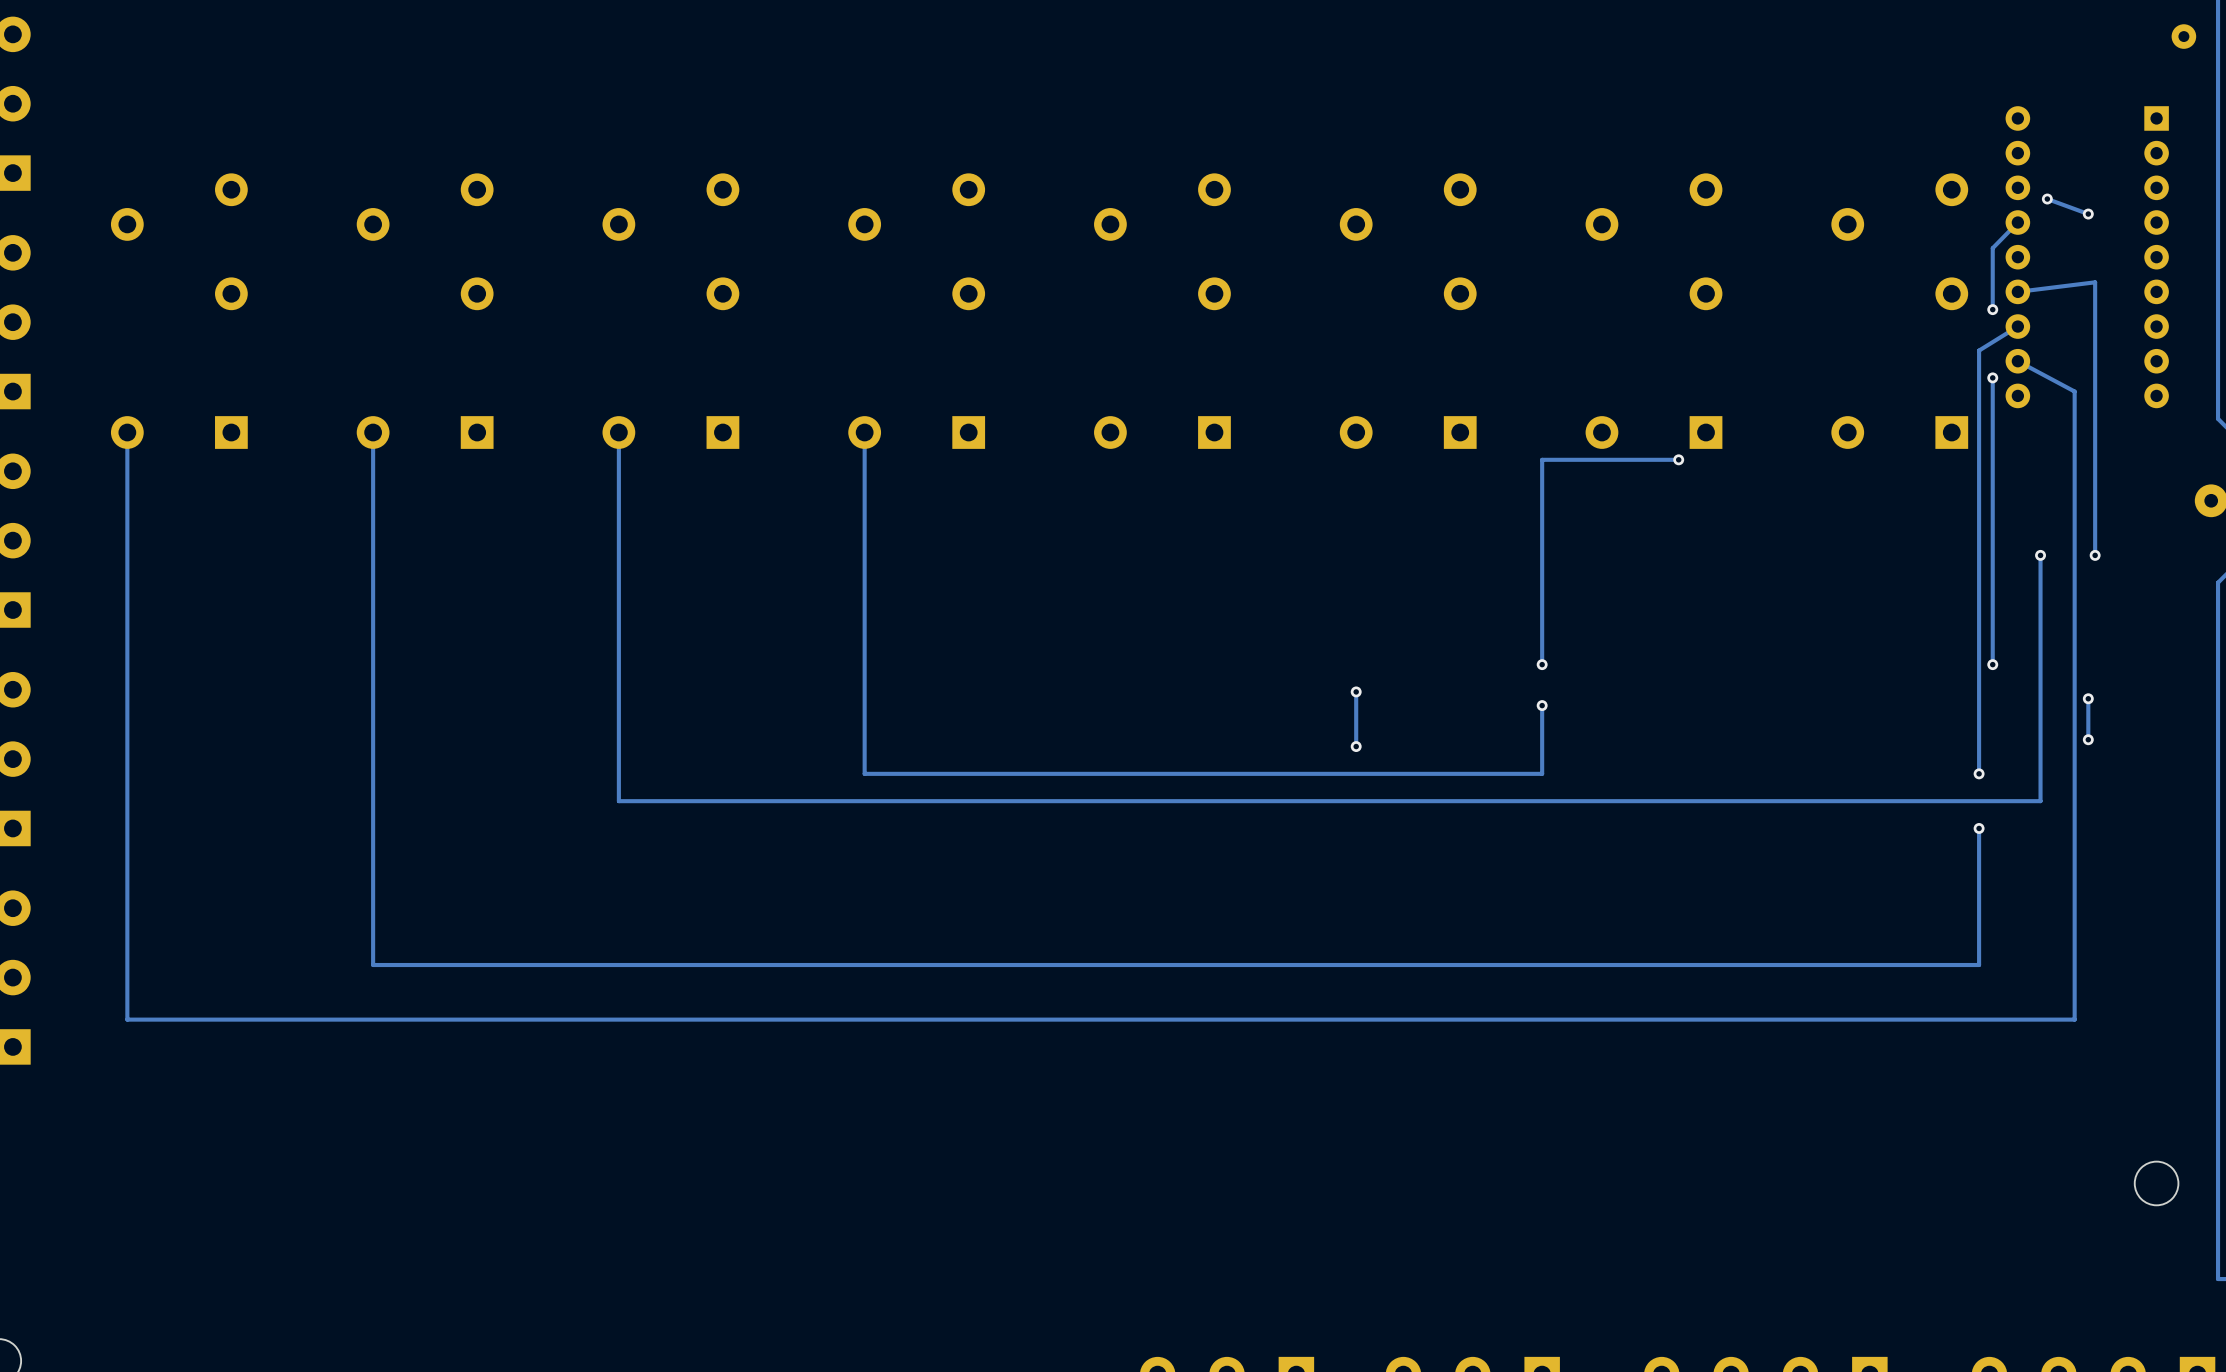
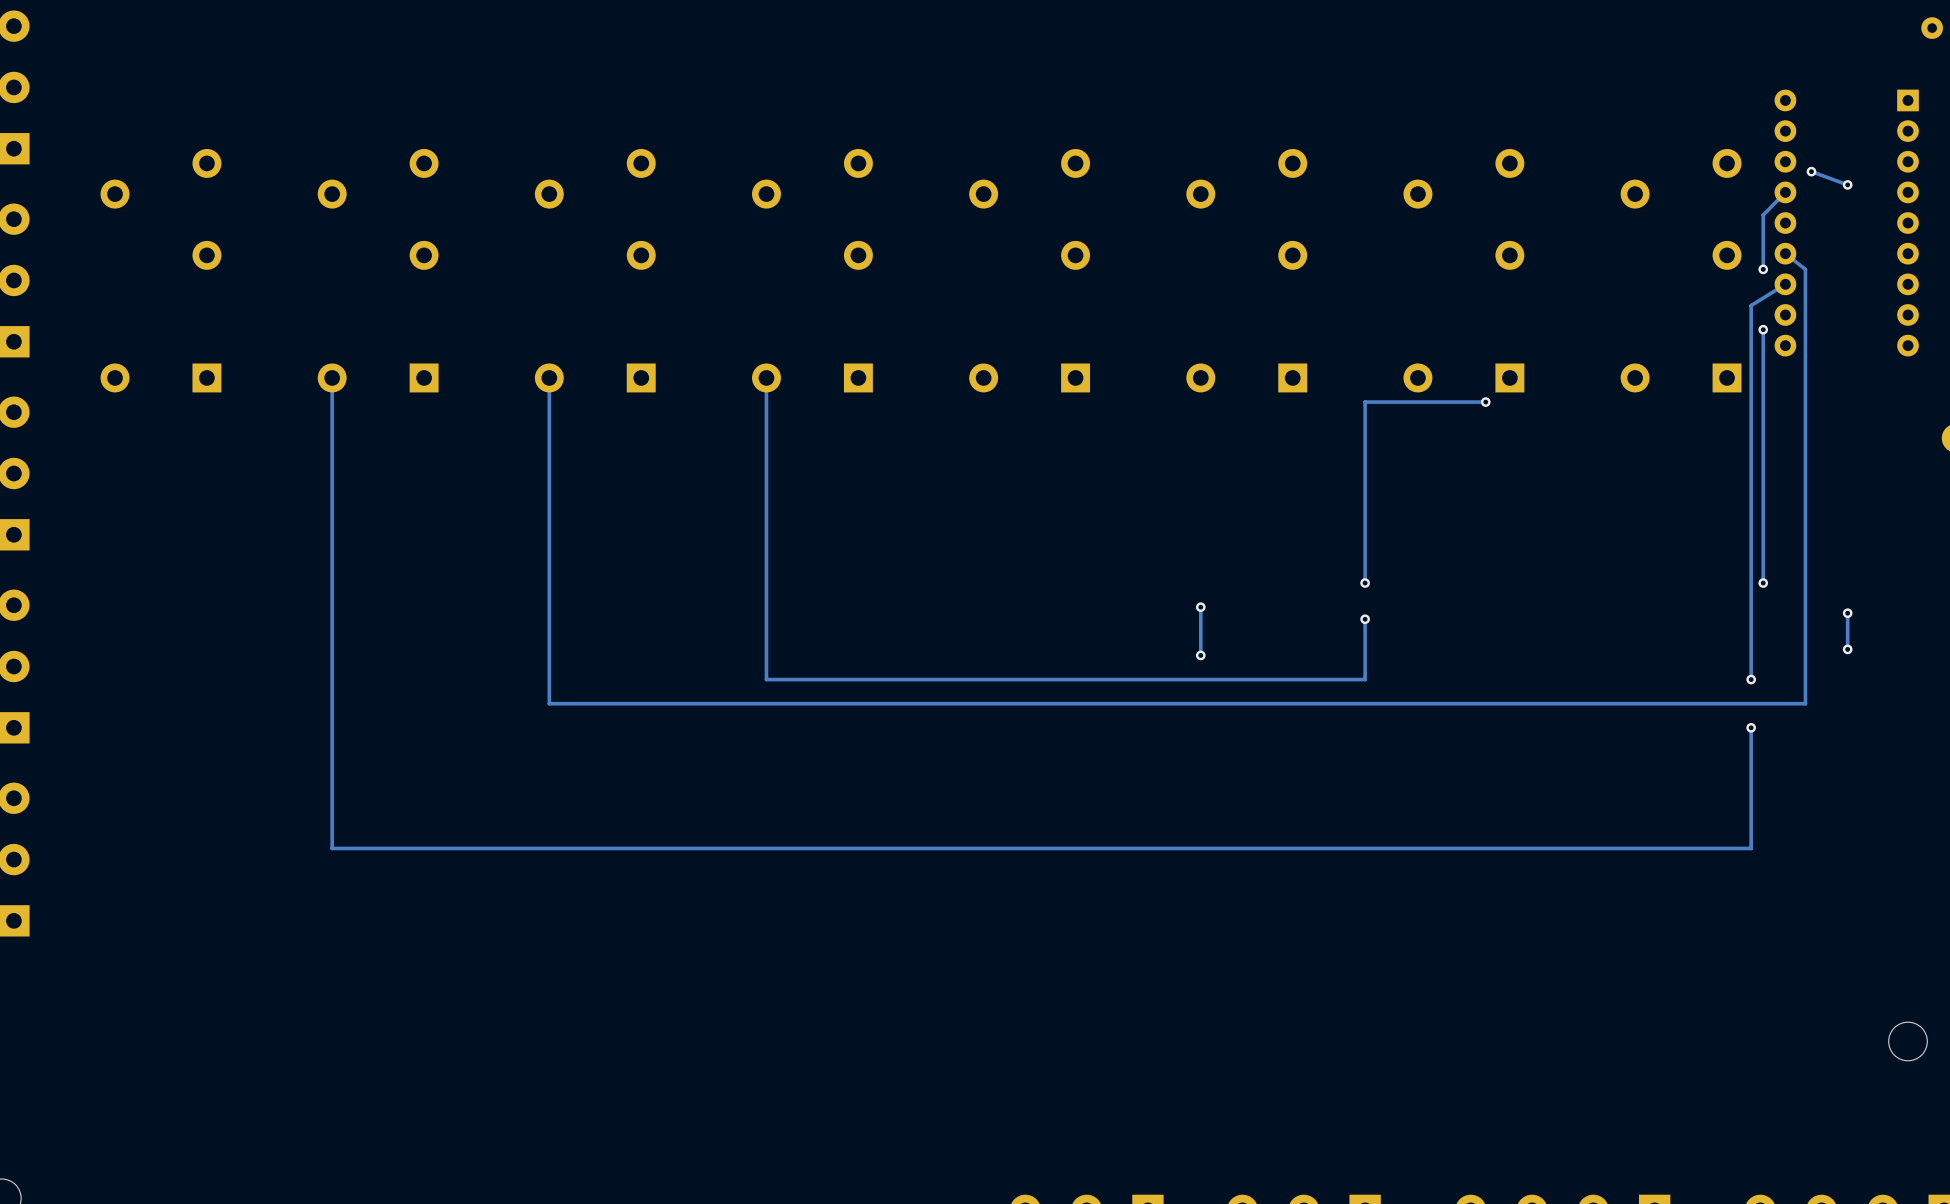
track: (2017, 291) (2095, 282) (2095, 555) -> (1785, 253) (1805, 269) (1805, 486)
track: (2017, 361) (2074, 391) (2074, 1019) (127, 1019) (127, 432) -> none
via: (2040, 555) -> none
via: (2095, 555) -> none

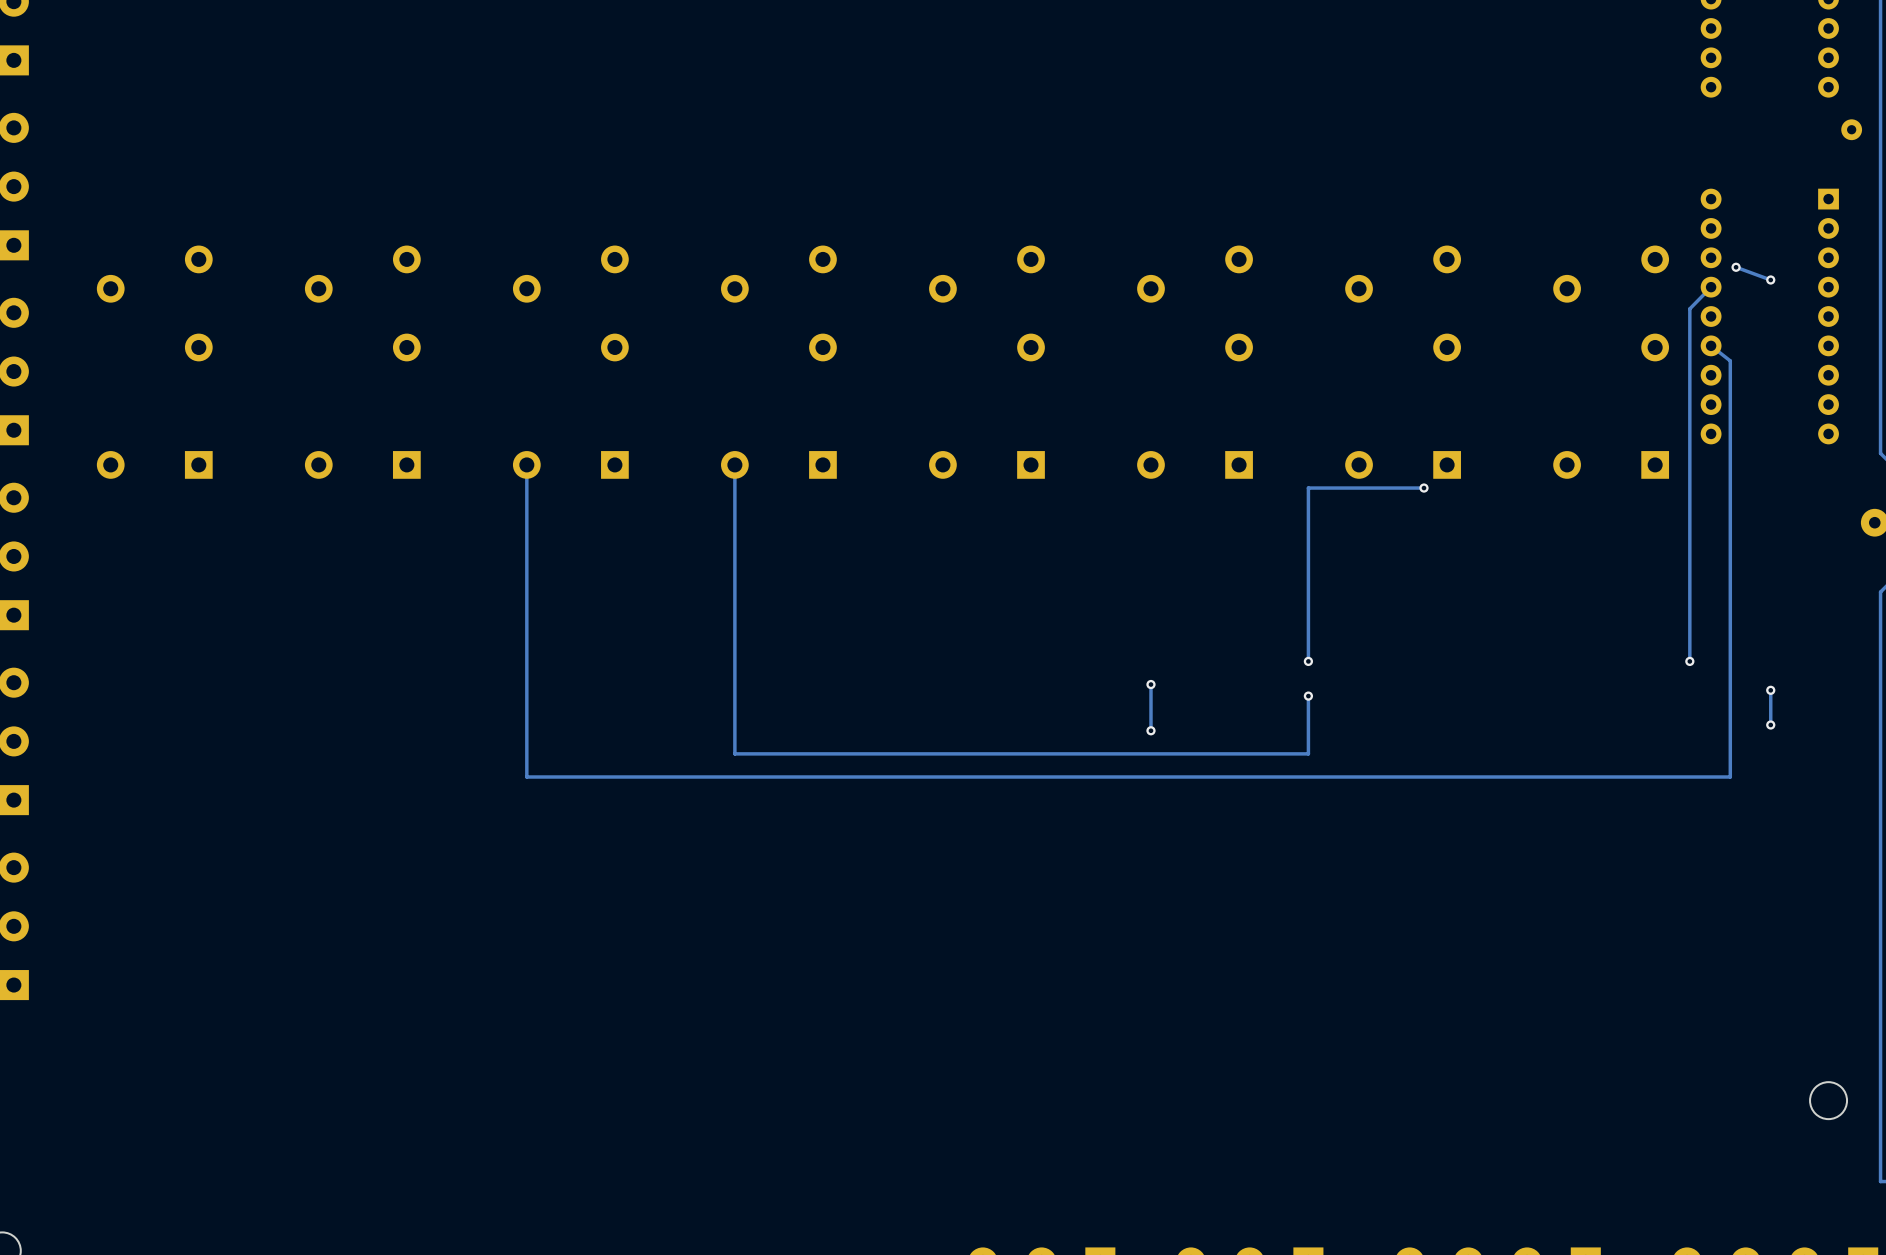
track: none -> (1689, 360) (1689, 418)
via: (1763, 269) -> none
track: (1785, 284) (1751, 305) (1751, 679) -> none
via: (1763, 329) -> none
track: (332, 377) (332, 848) (1751, 848) (1751, 727) -> none
via: (1751, 679) -> none
via: (1751, 727) -> none

